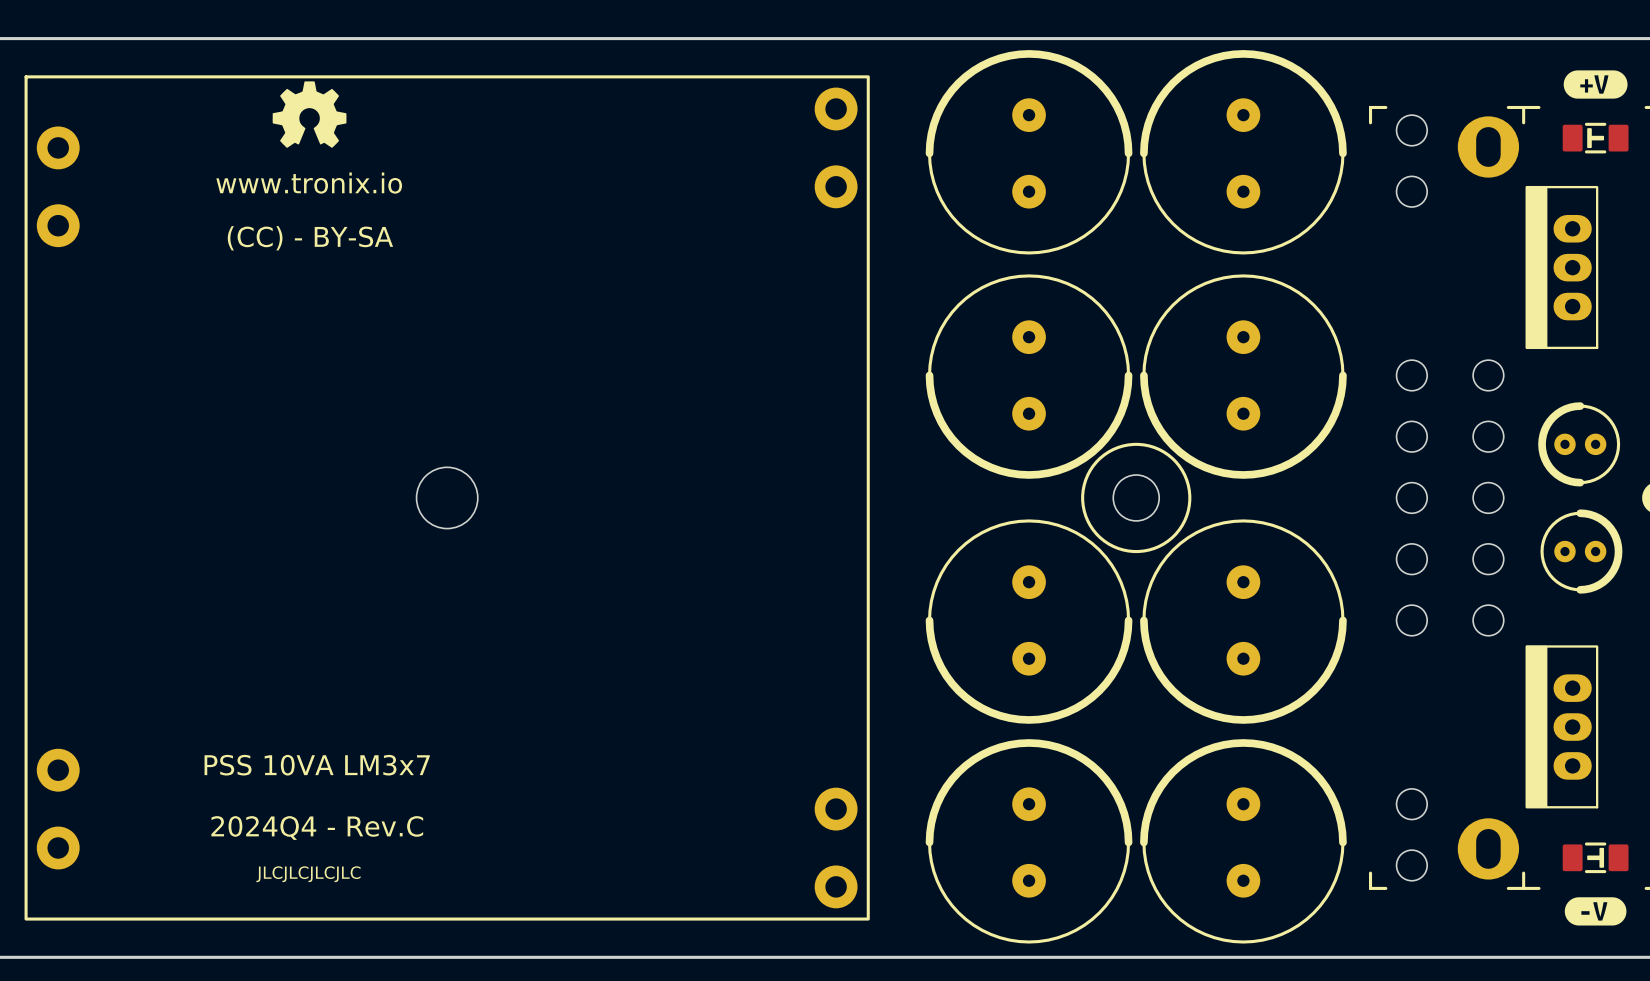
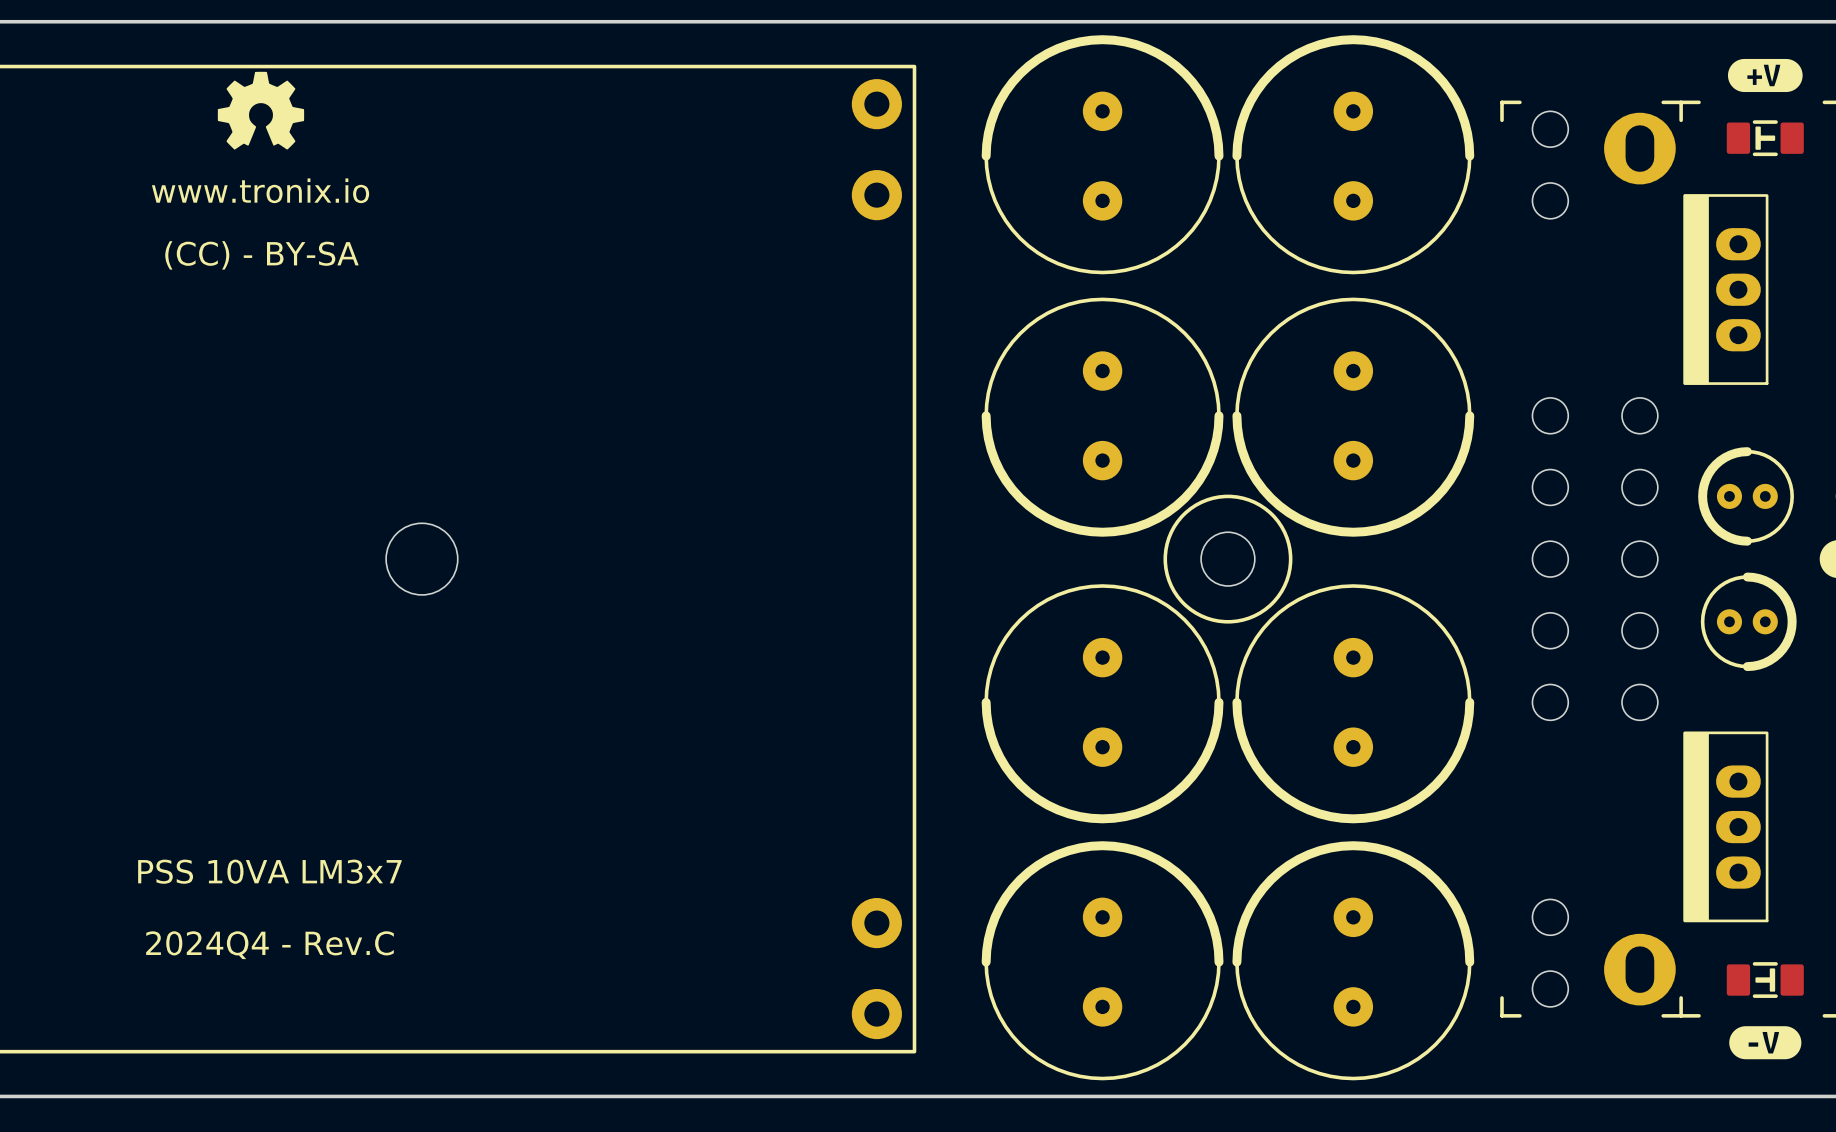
text: JLCJLCJLCJLC (308, 874) -> none

